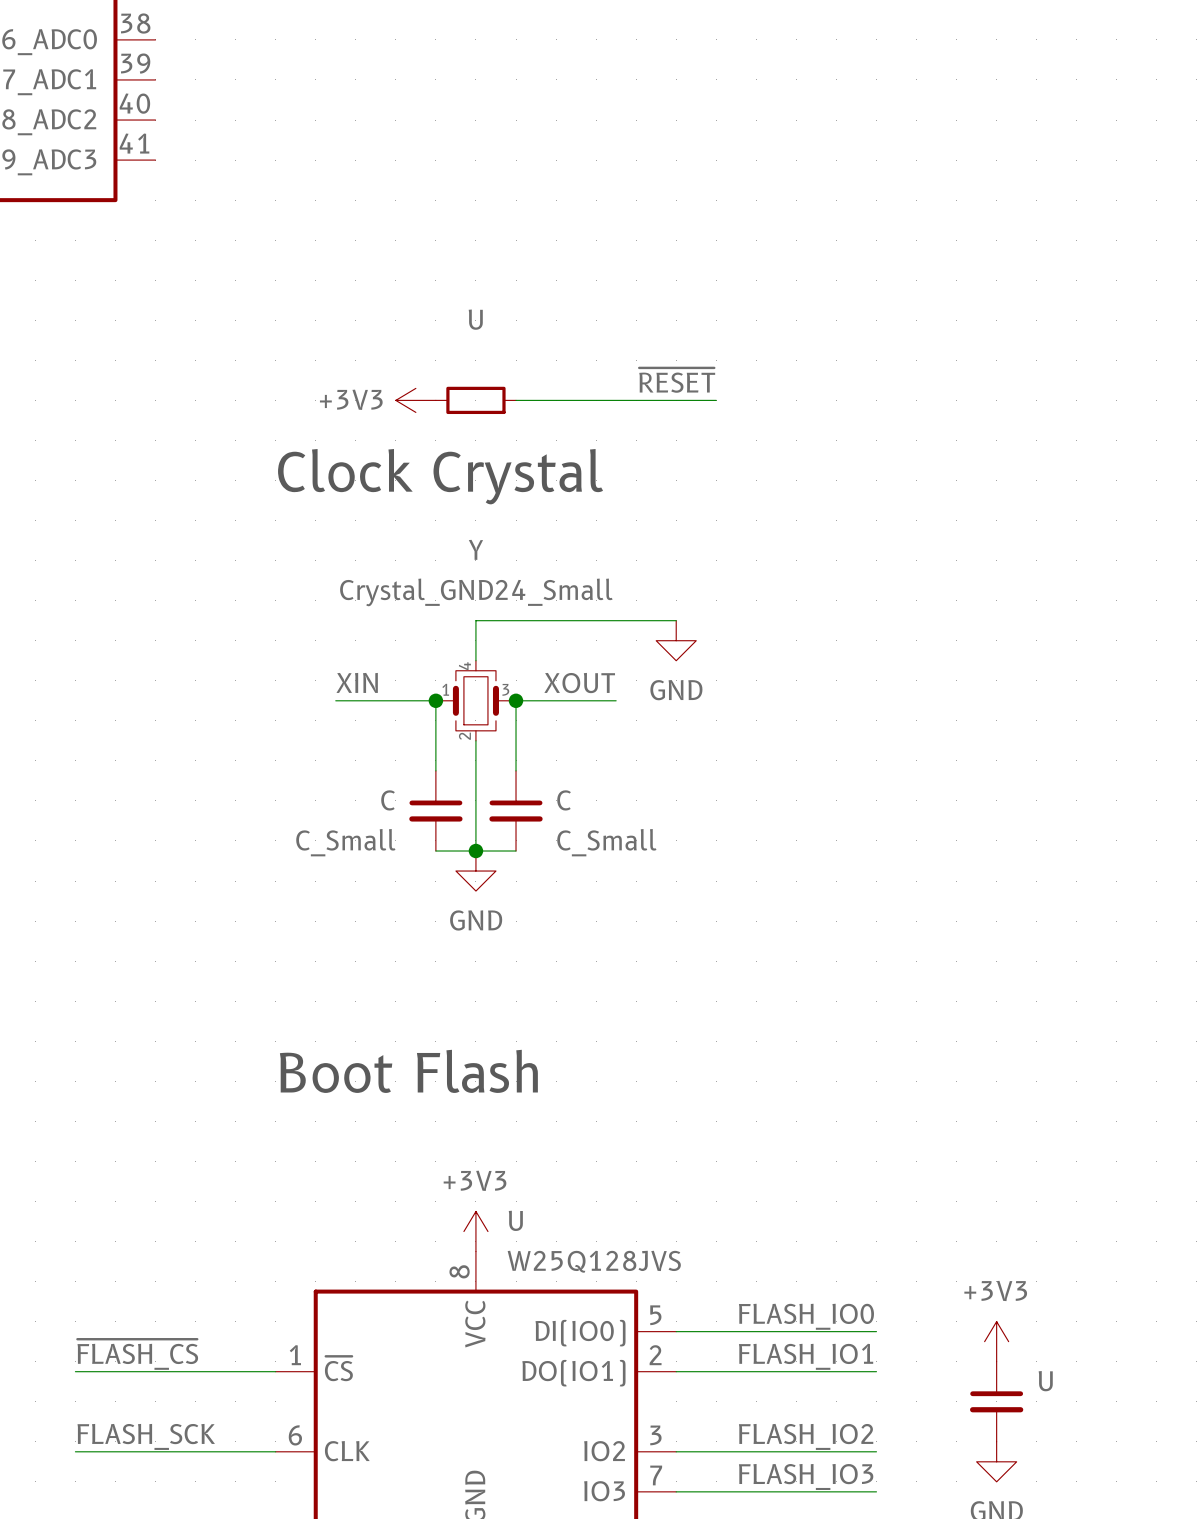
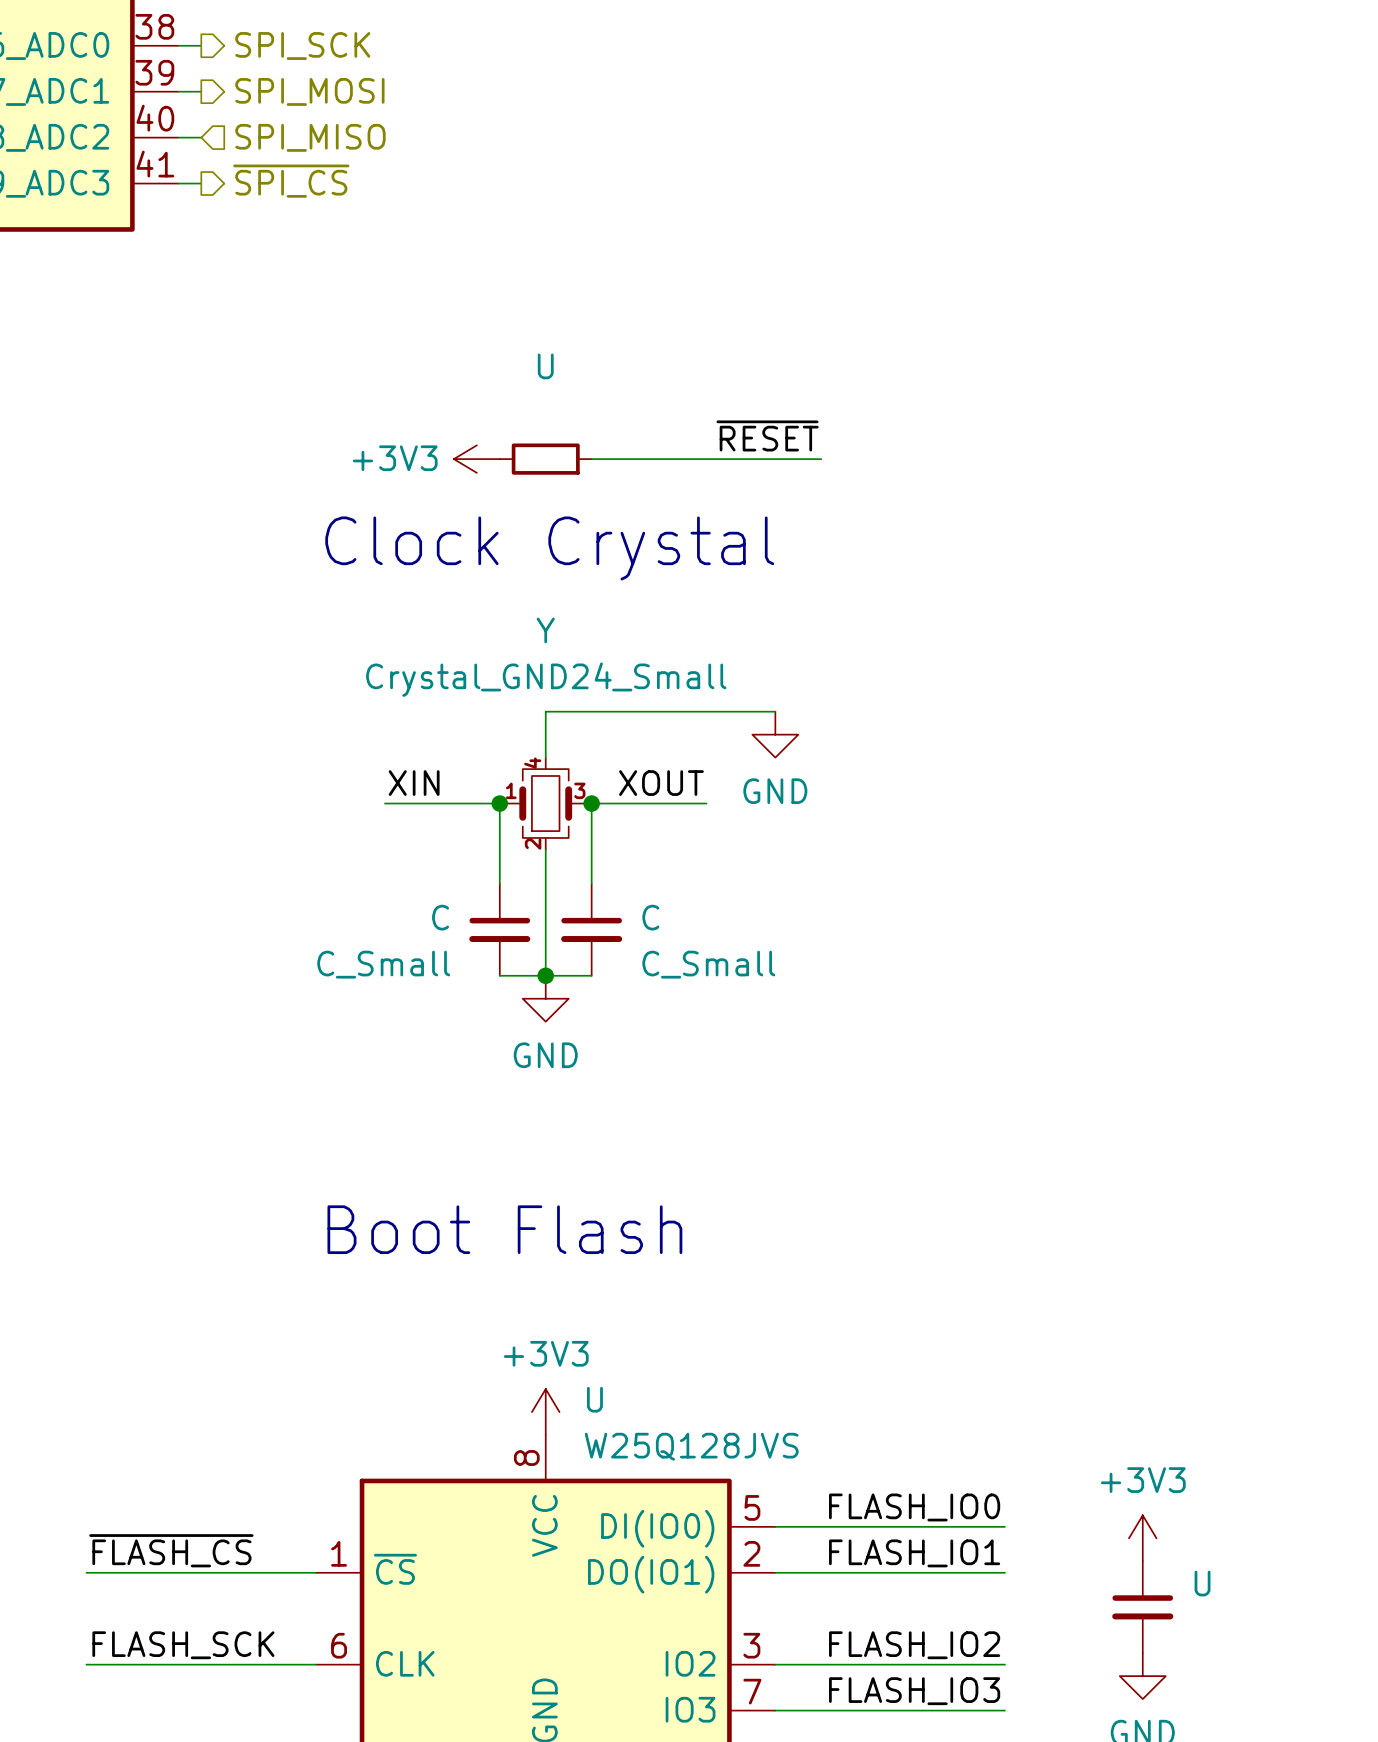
wire: none -> (178, 45) (201, 45)
hierarchical label: none -> SPI_SCK (302, 46)
wire: none -> (178, 91) (201, 91)
hierarchical label: none -> SPI_MOSI (309, 91)
wire: none -> (178, 137) (201, 137)
hierarchical label: none -> SPI_MISO (310, 137)
wire: none -> (178, 183) (201, 183)
hierarchical label: none -> ~{SPI_CS} (291, 181)

